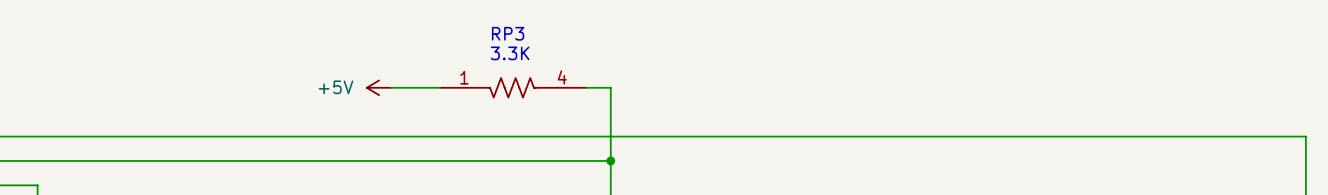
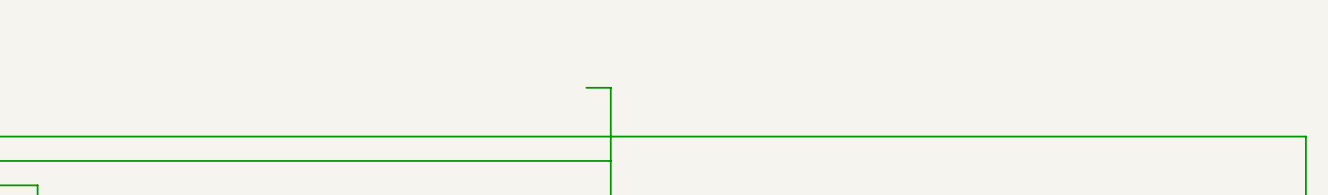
text: RP3 (508, 33) -> none
text: 3.3K (510, 53) -> none
power symbol: +5V (379, 87) -> none
wire: (391, 87) (440, 87) -> none
part: (513, 87) -> none
junction: (610, 160) -> none

